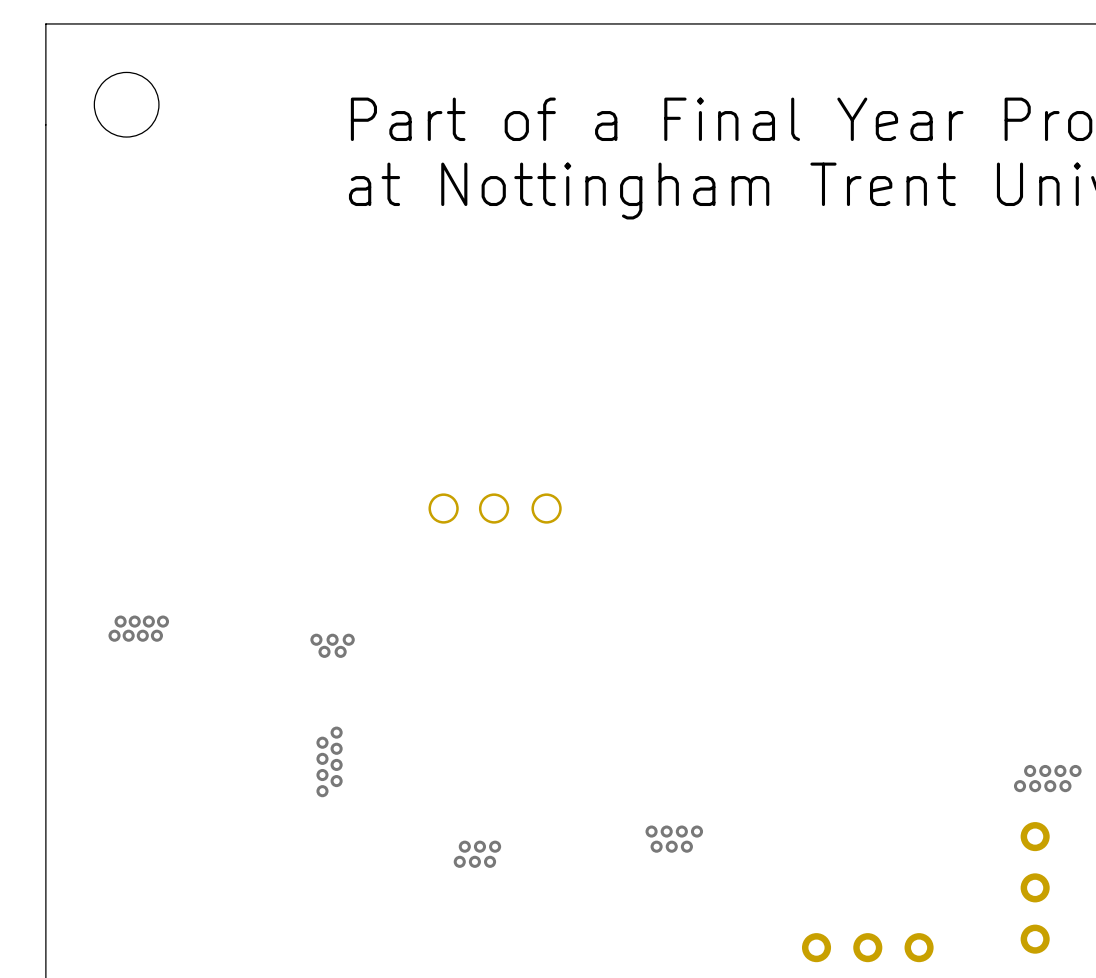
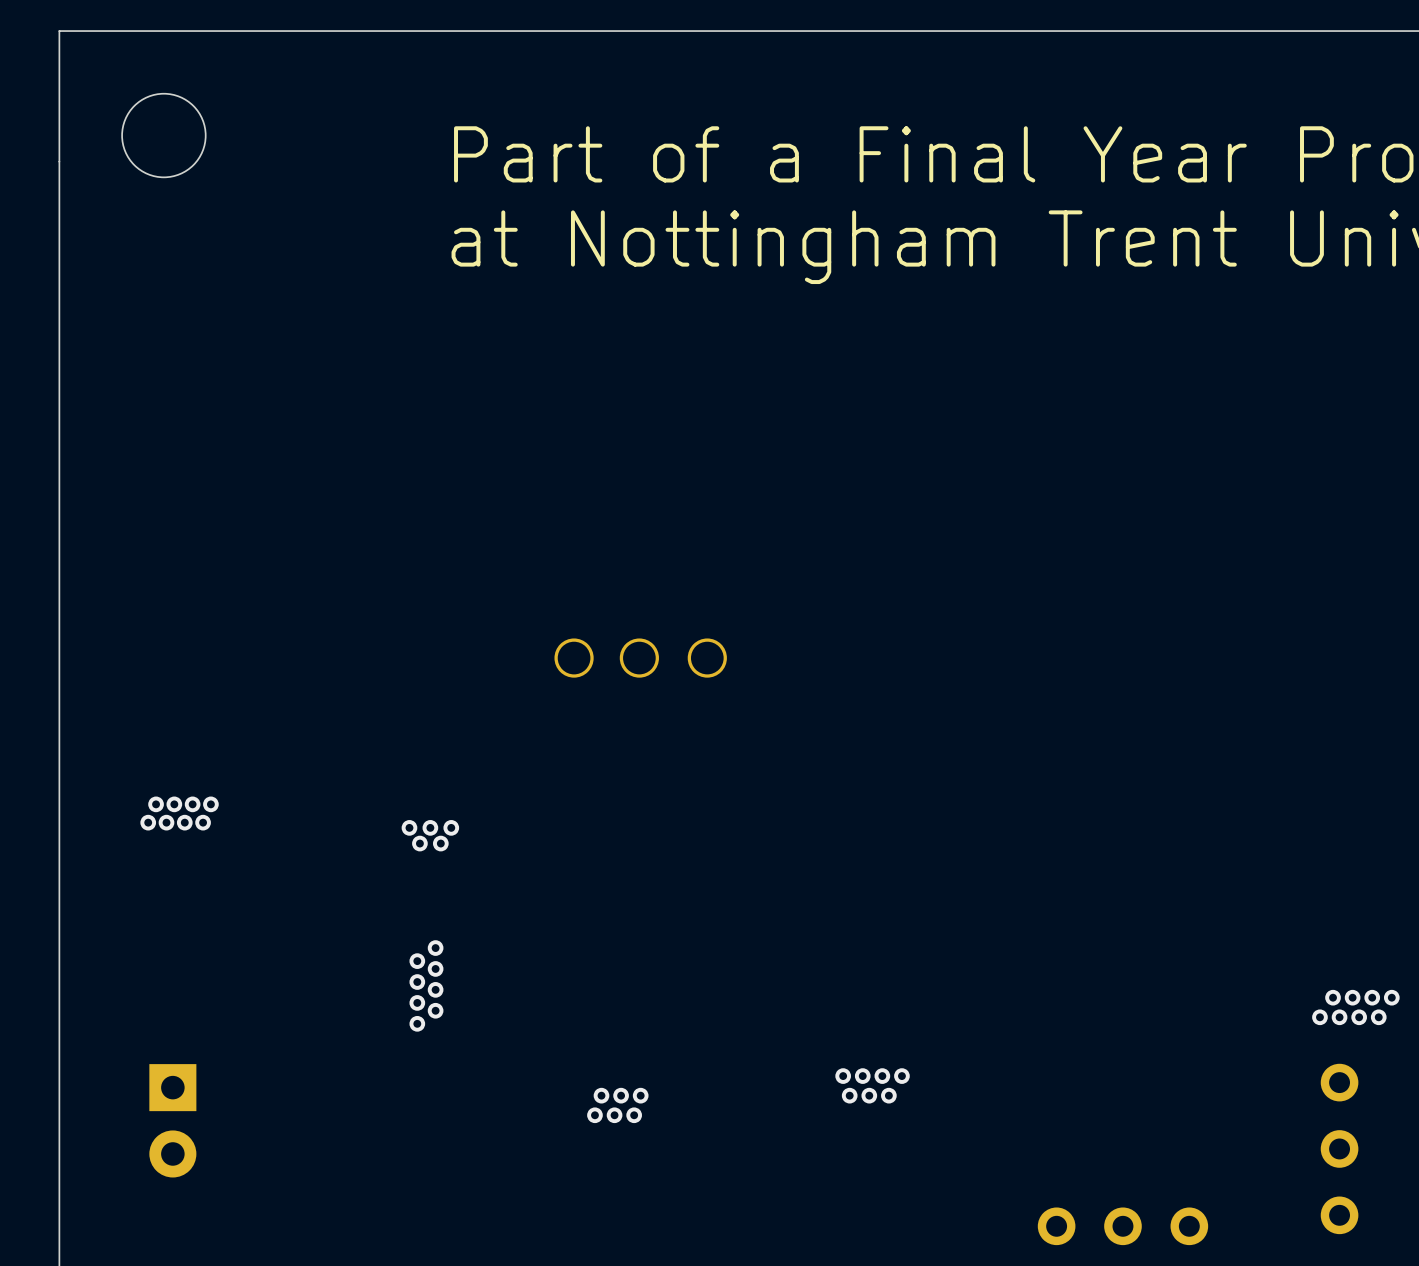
part: none -> (172, 1120)

